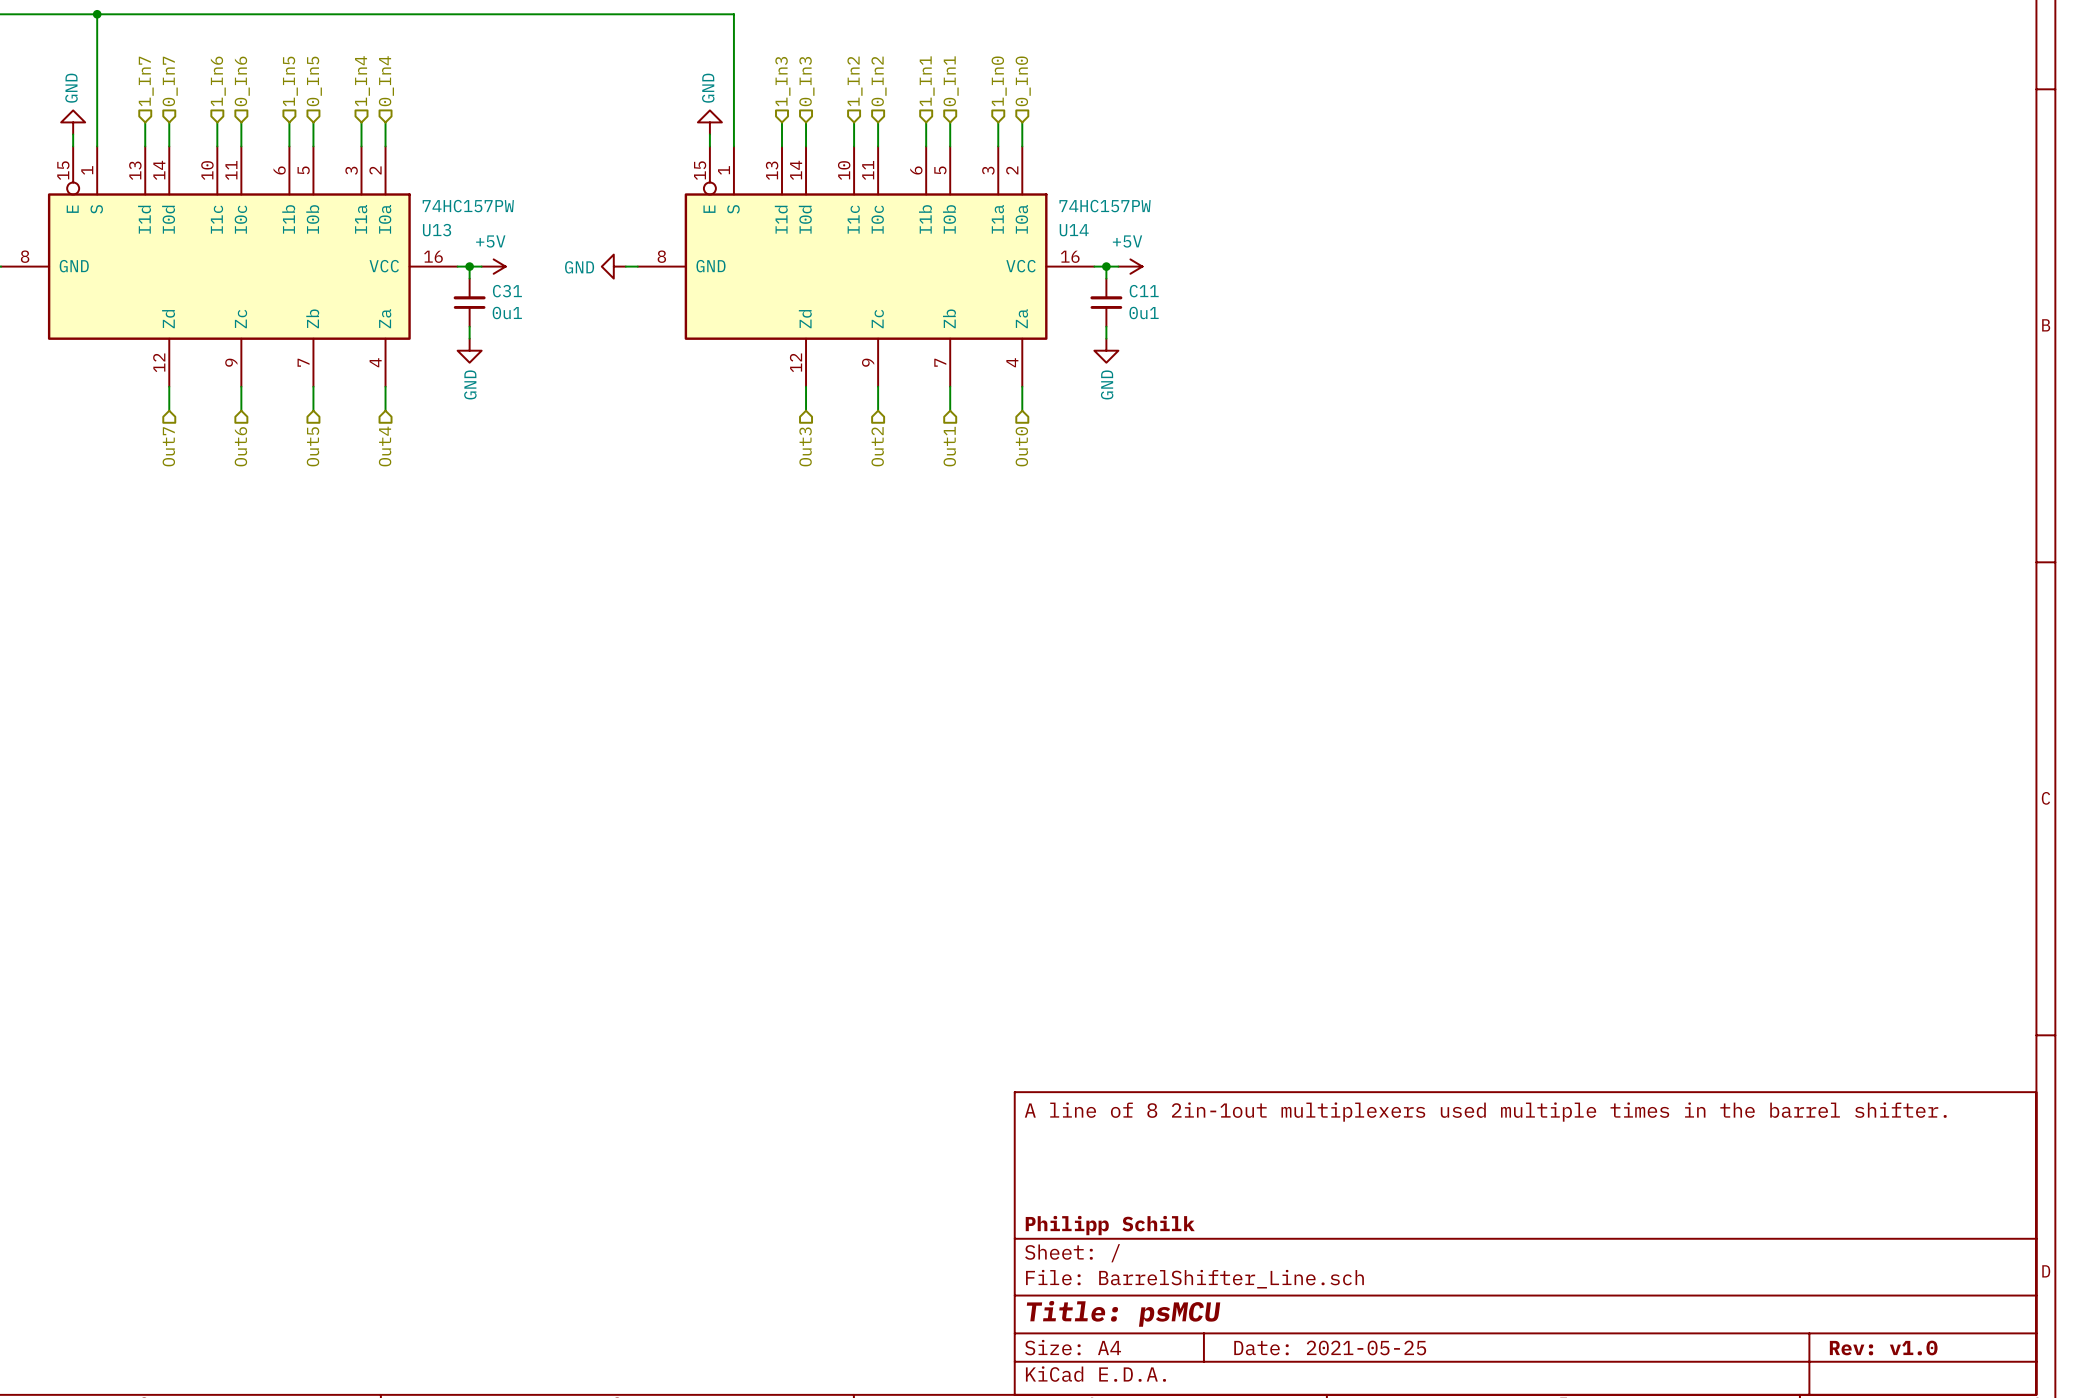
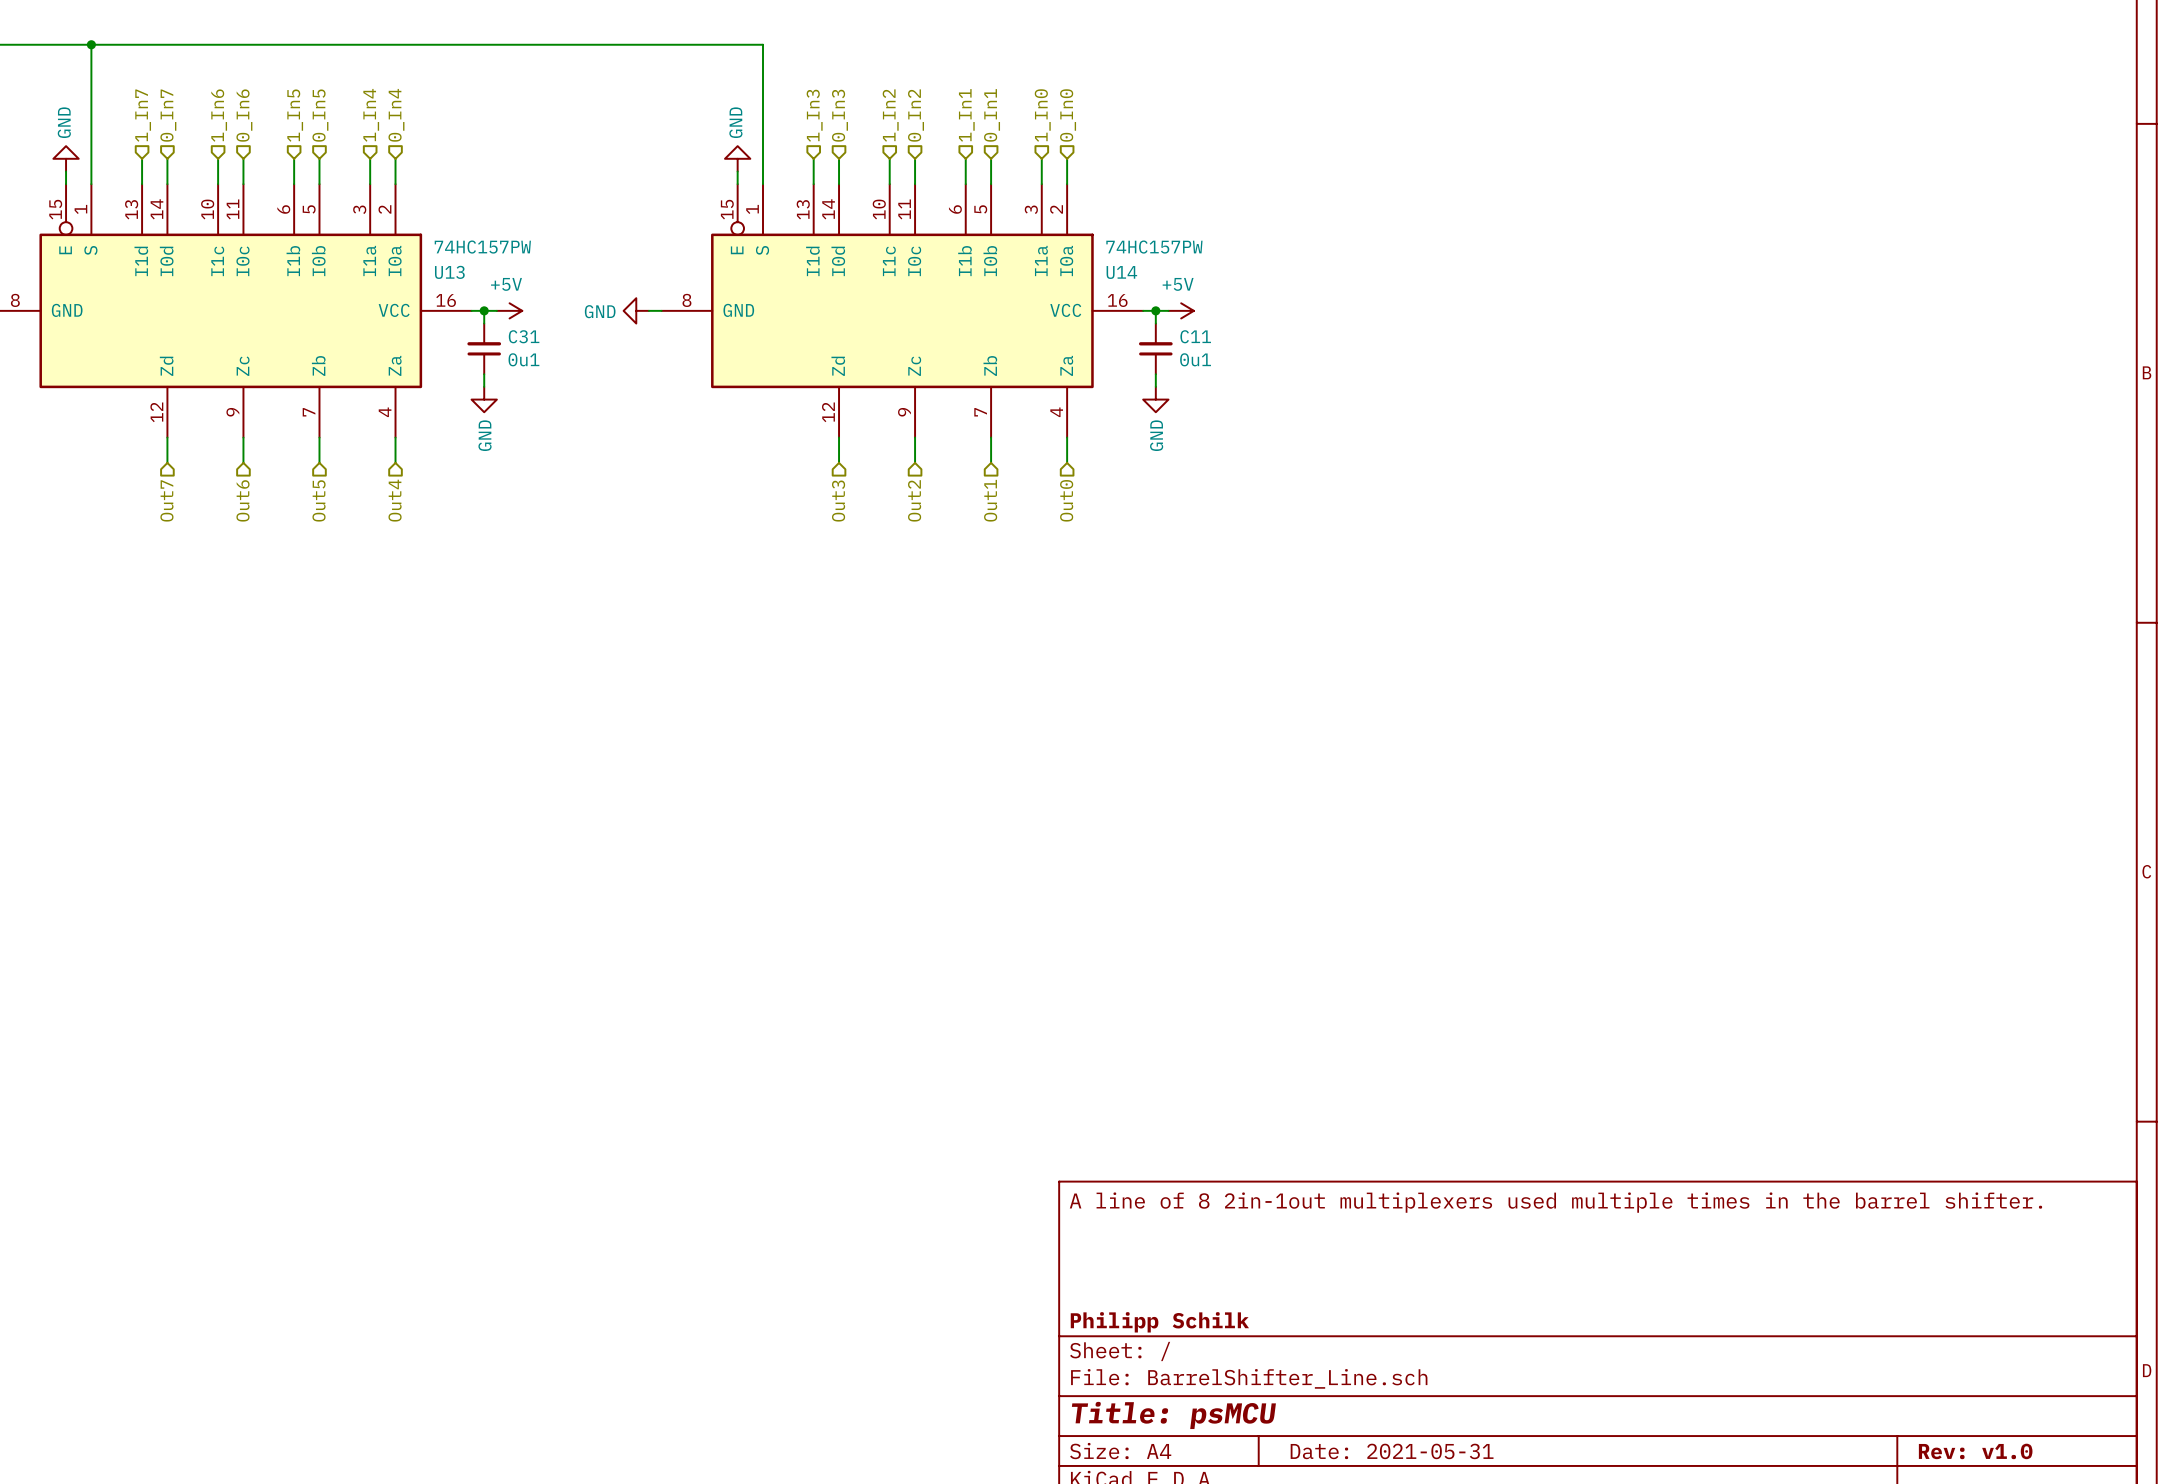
title block: Date: 2021-05-25 (1330, 1347) -> Date: 2021-05-31 (1392, 1451)

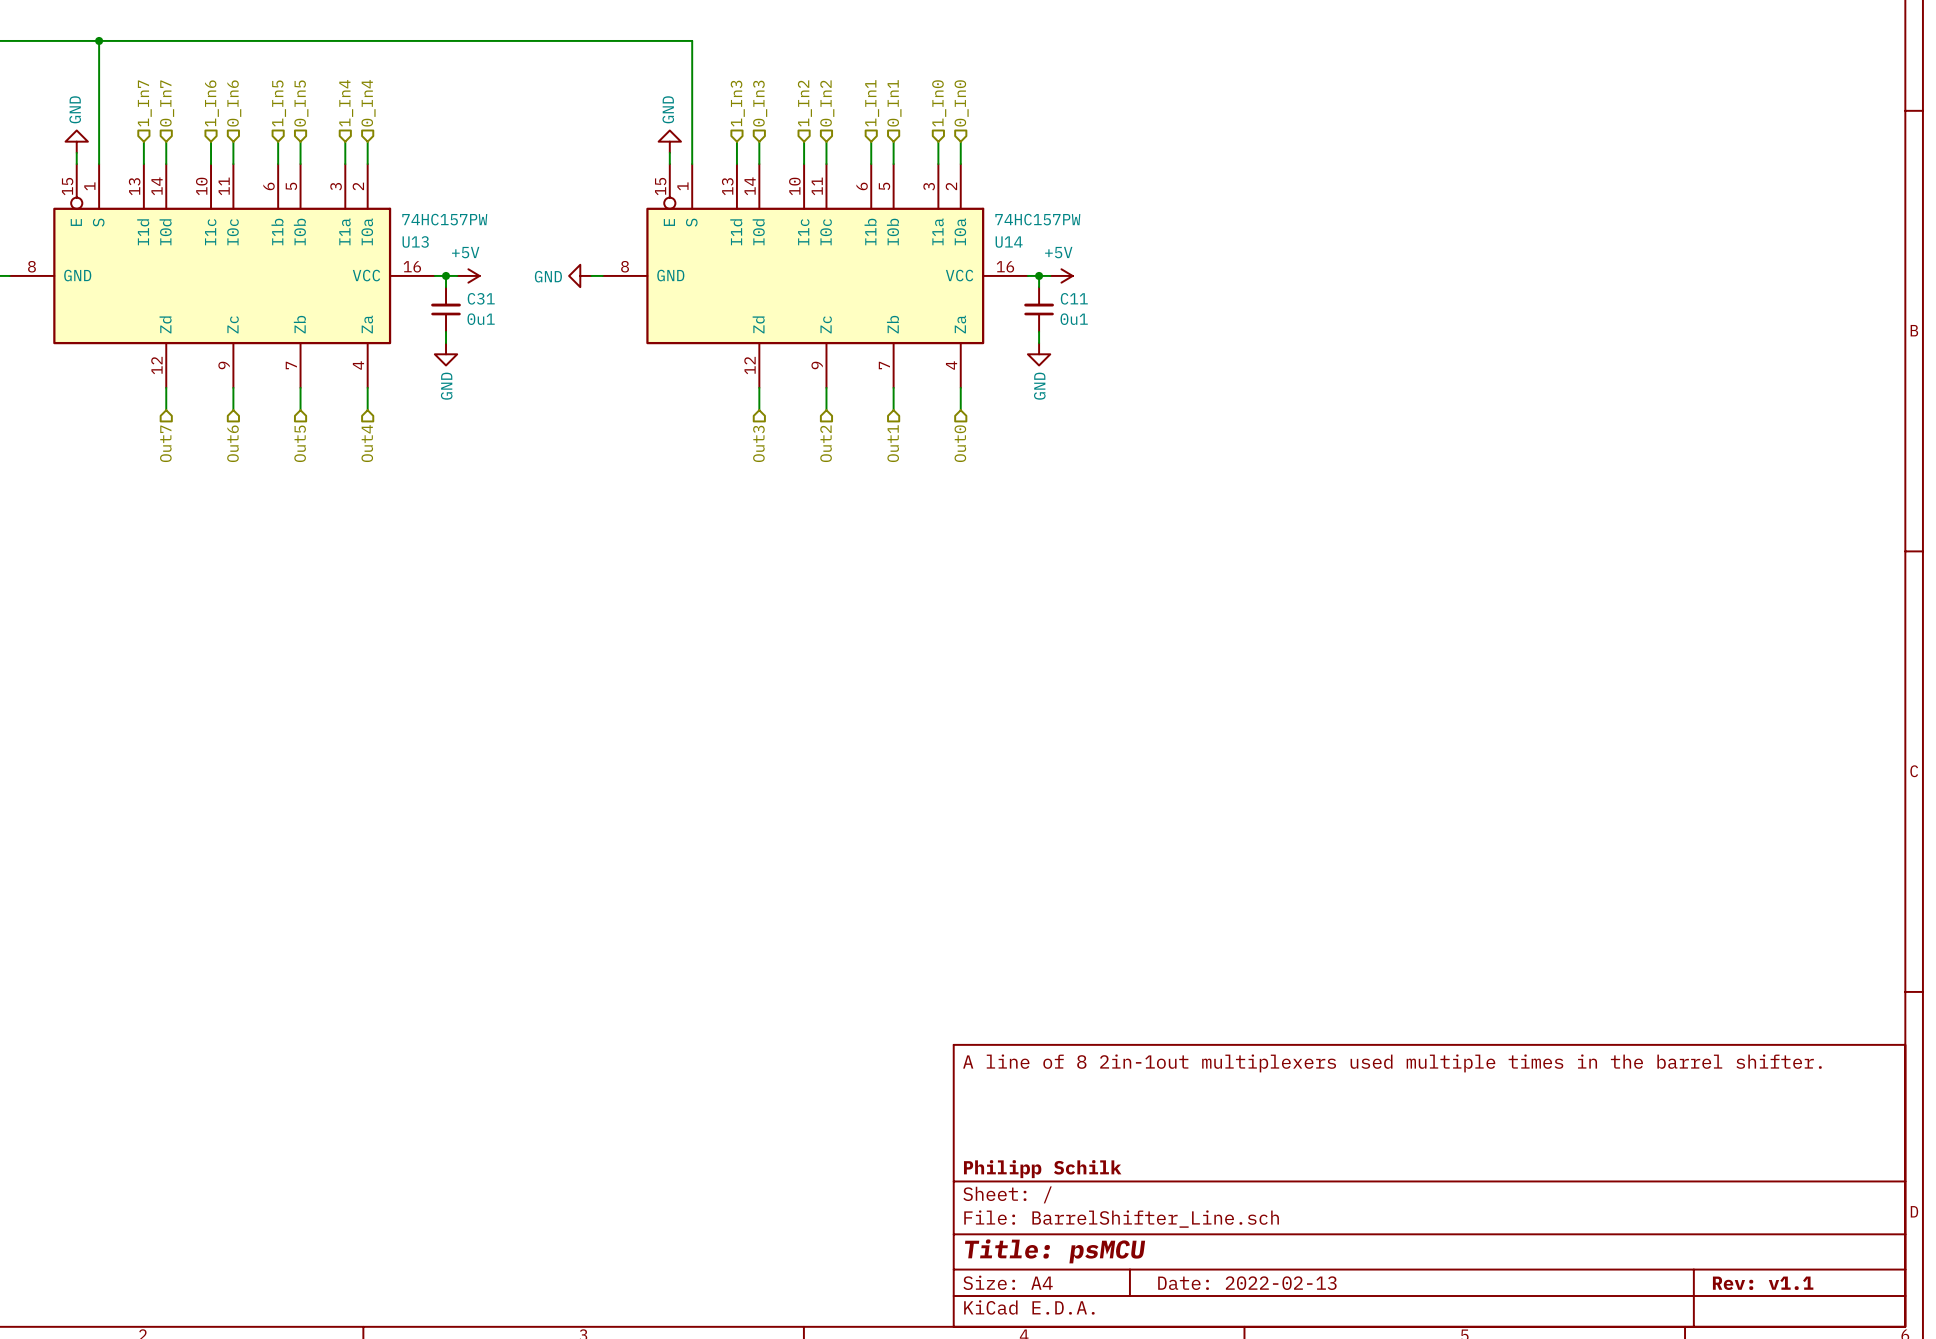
title block: Date: 2021-05-31 (1392, 1451) -> Date: 2022-02-13 (1247, 1283)
title block: Rev: v1.0 (1975, 1451) -> Rev: v1.1 (1763, 1283)

